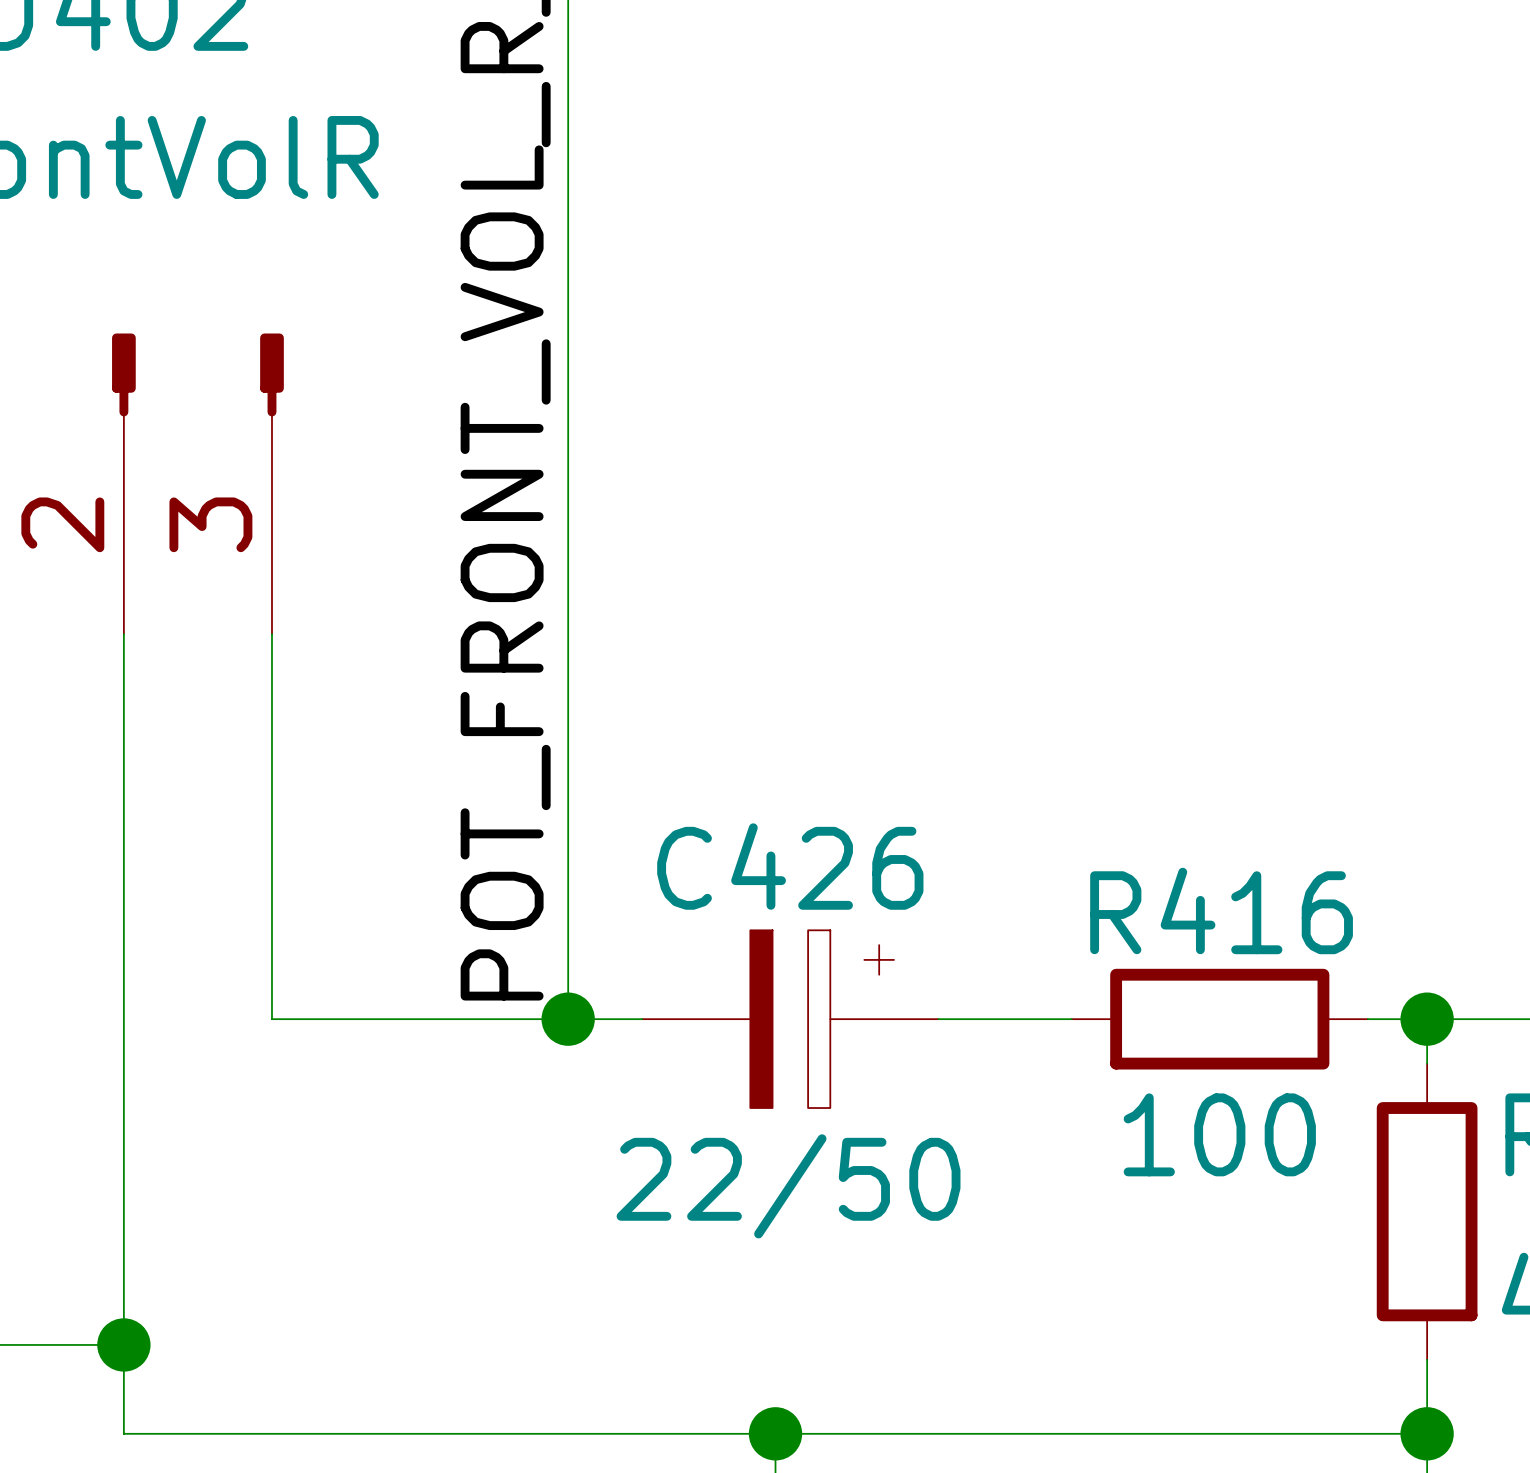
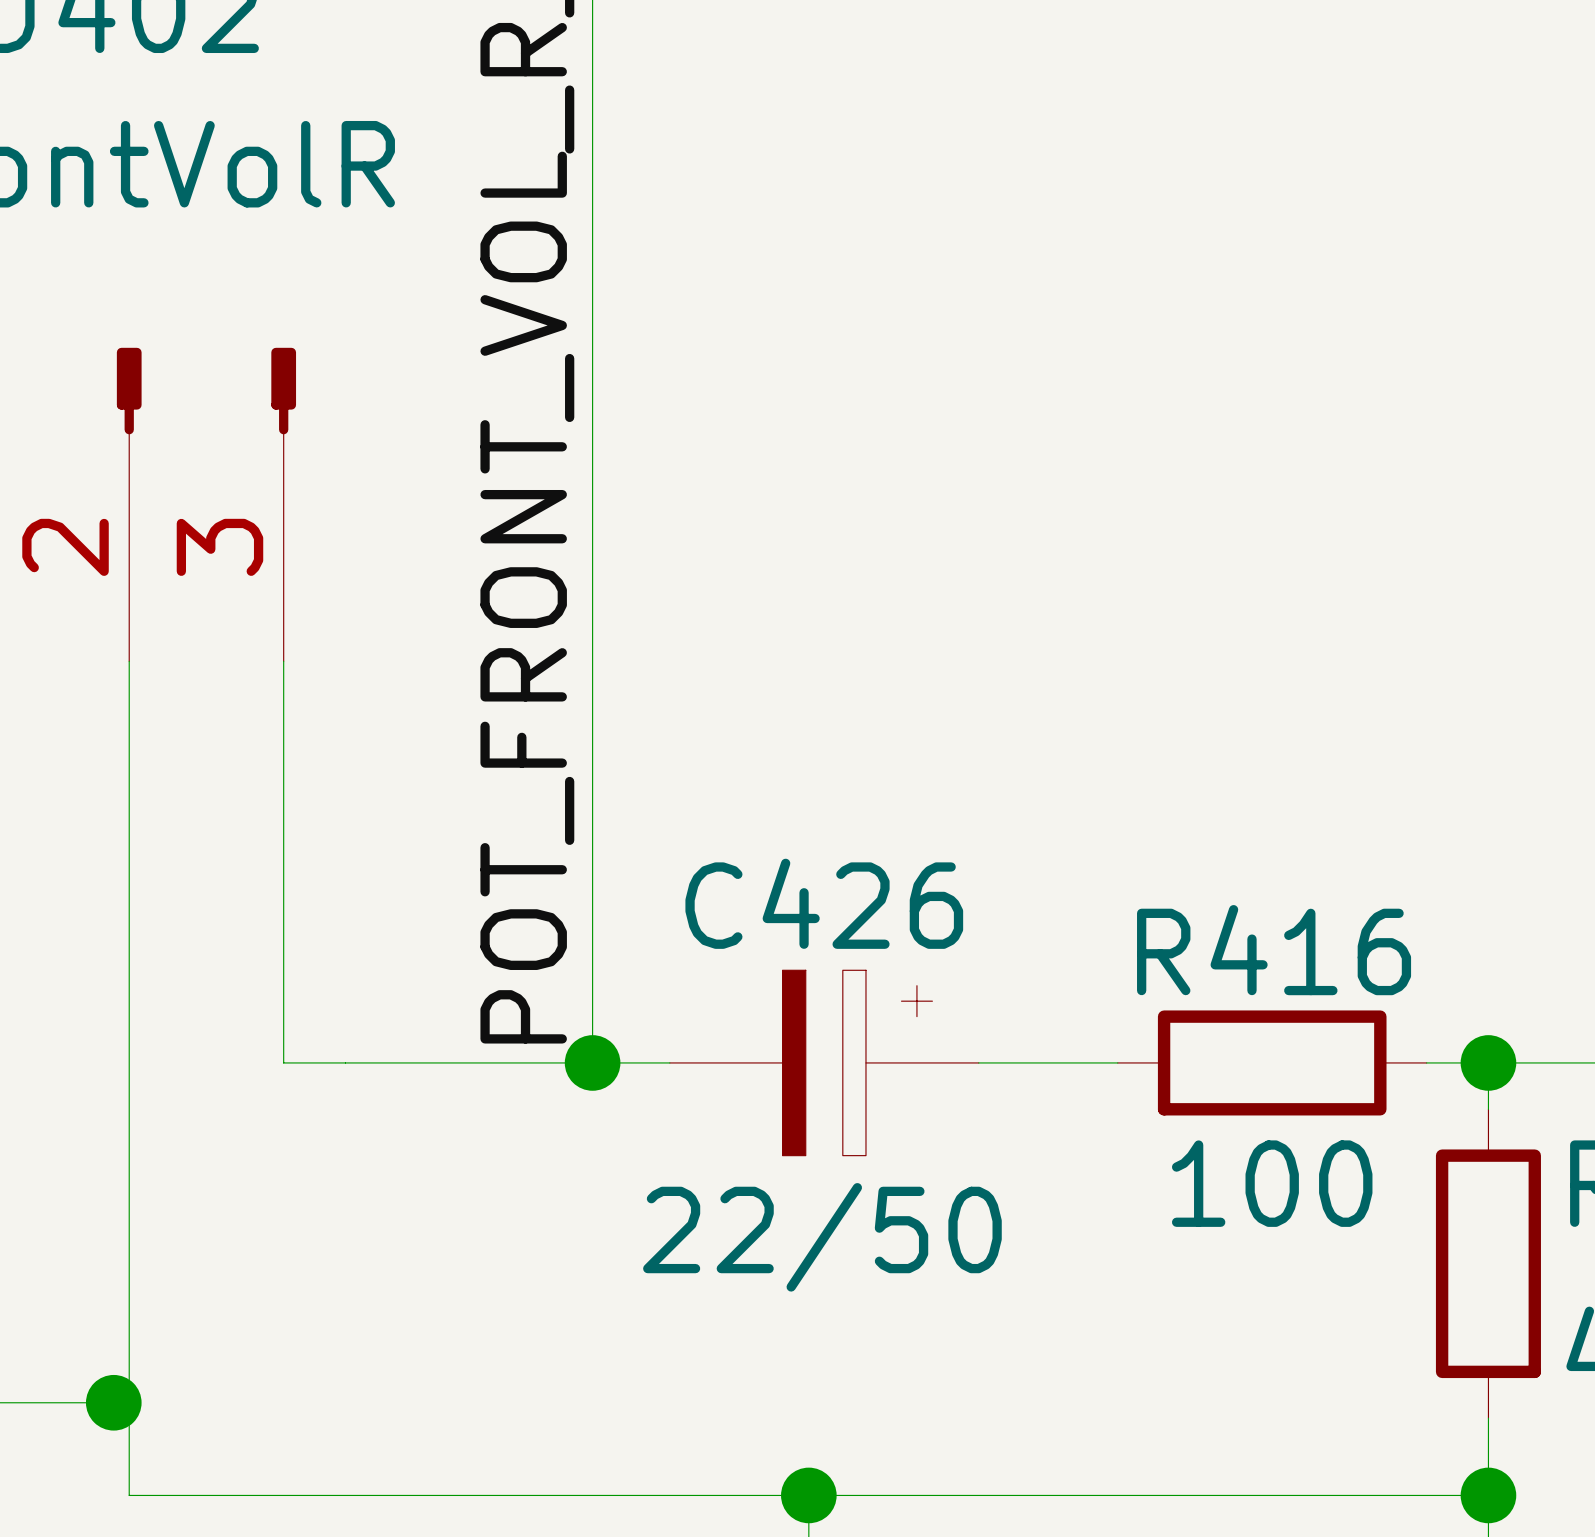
junction position: (123, 1344) -> (113, 1402)

